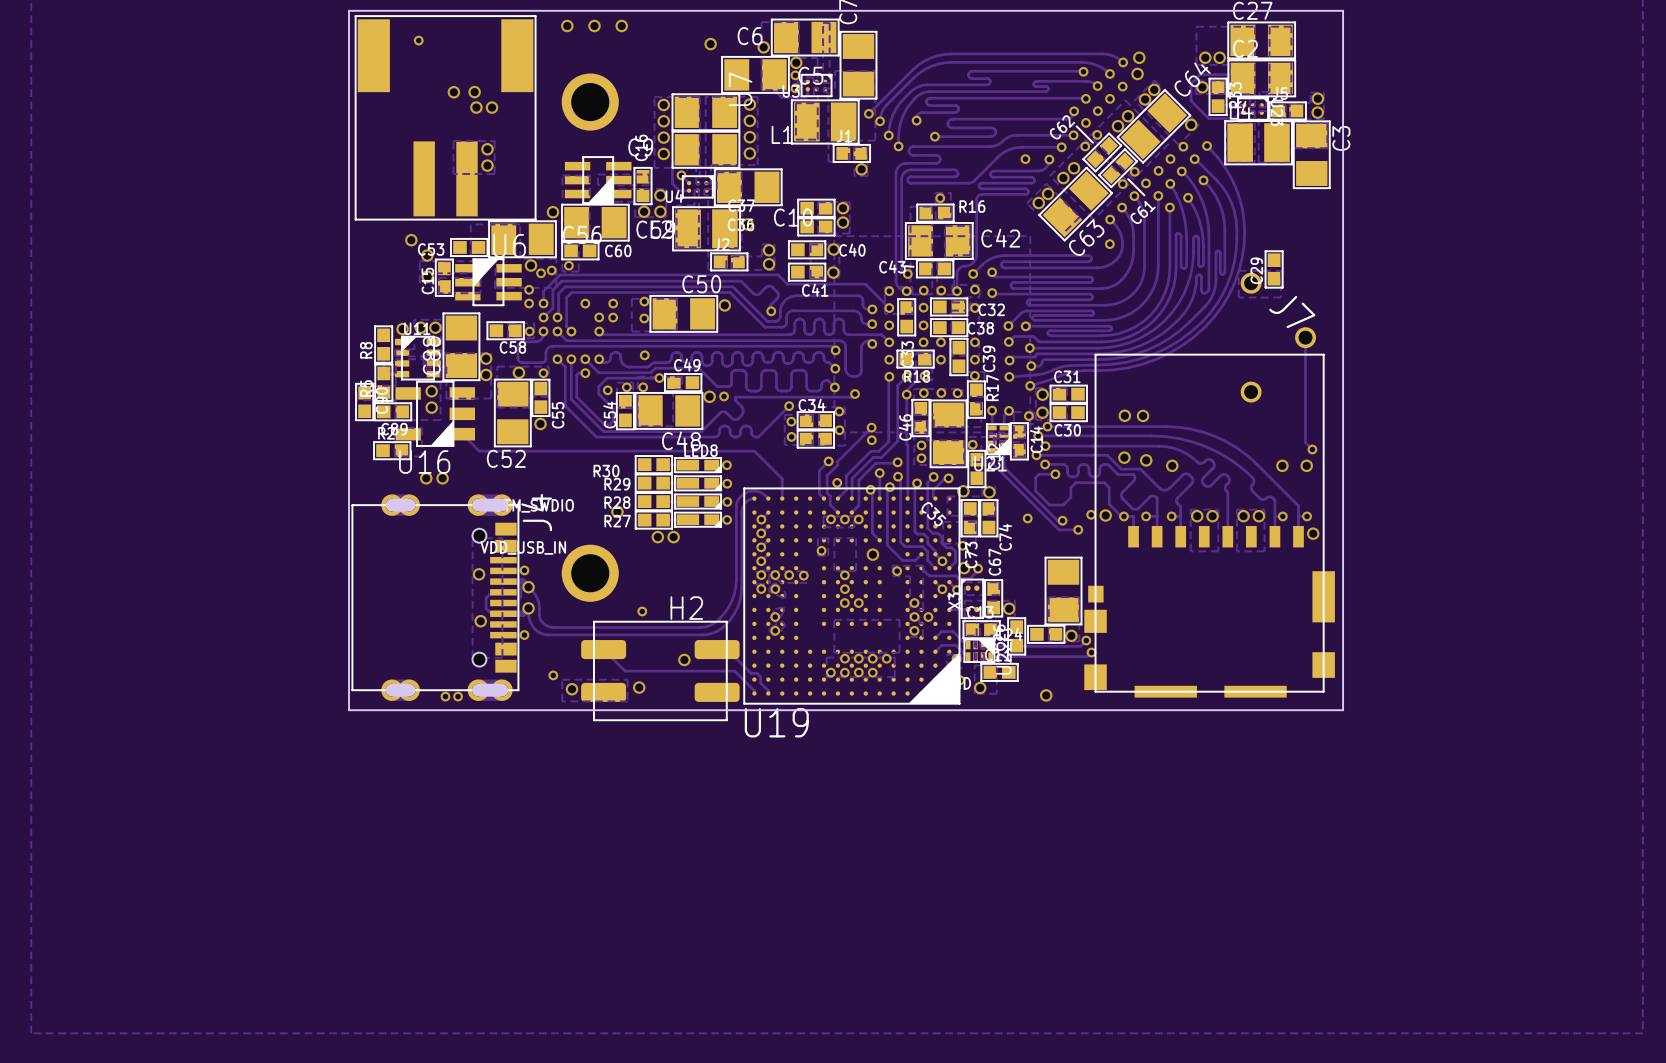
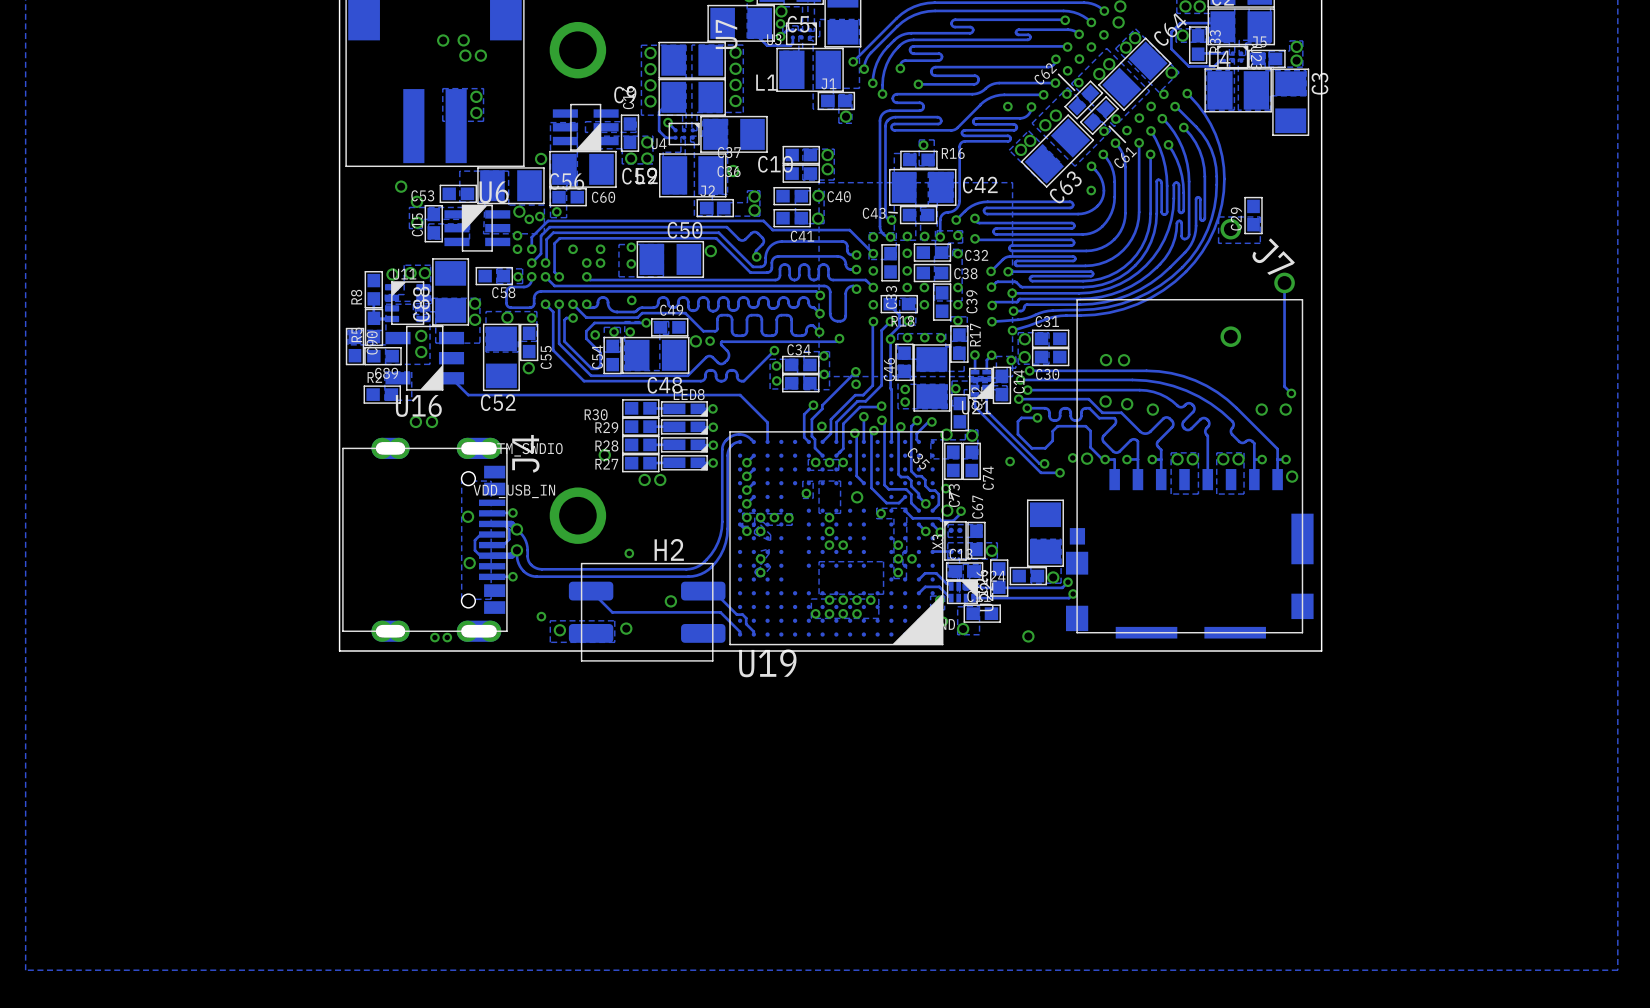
zone outline: (975, 521) (943, 521) (943, 543) (975, 543) (975, 521) -> none

